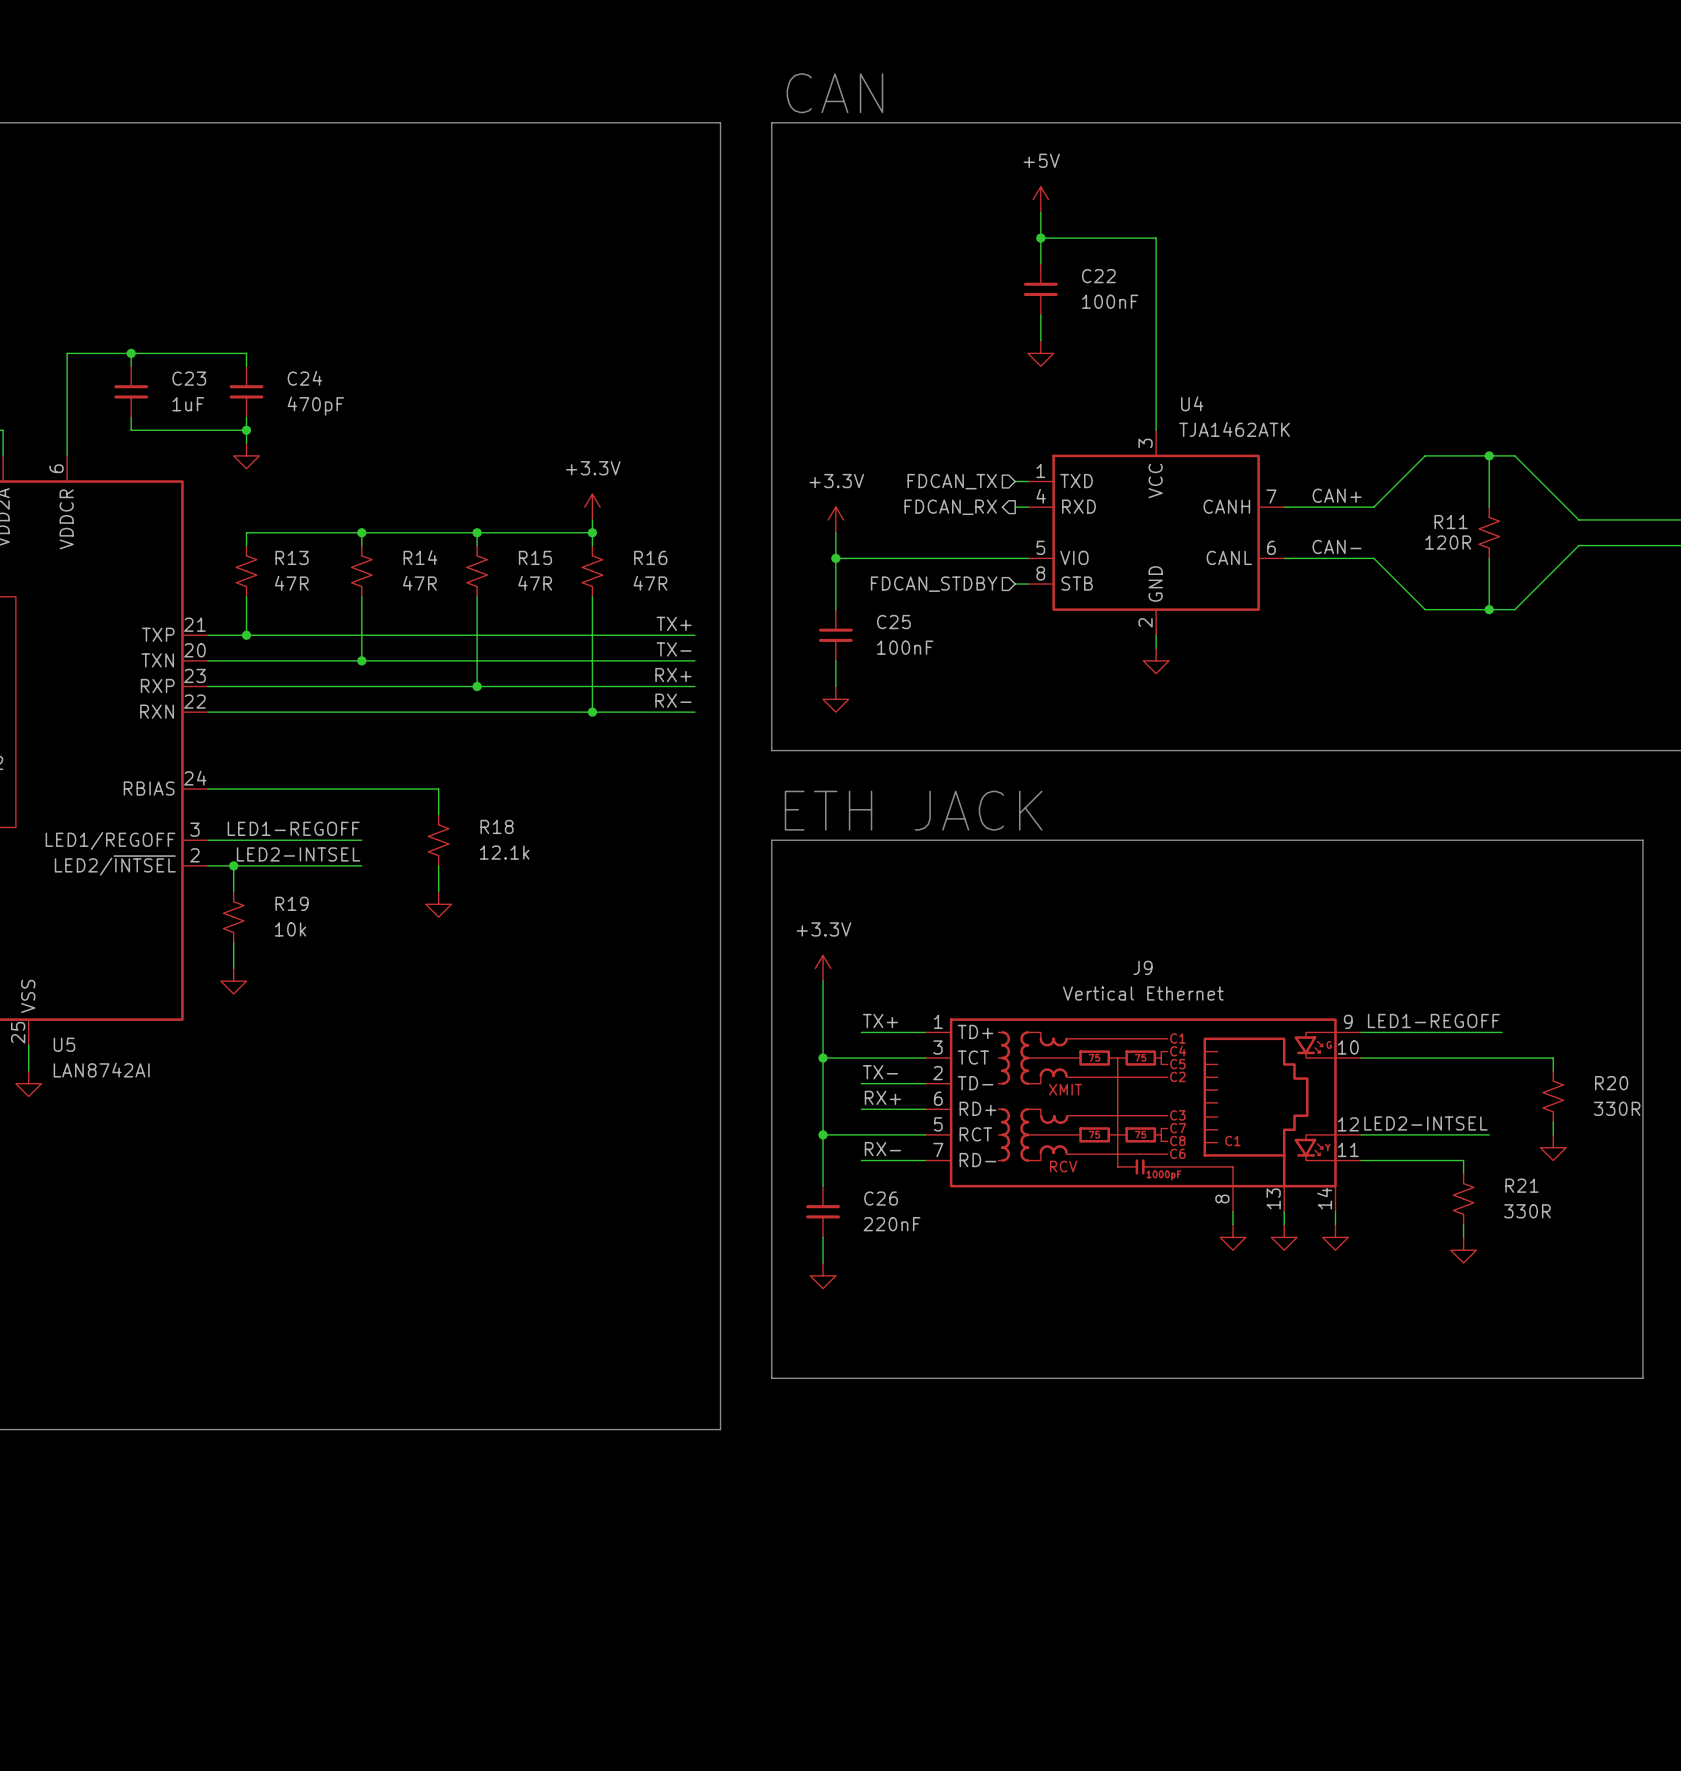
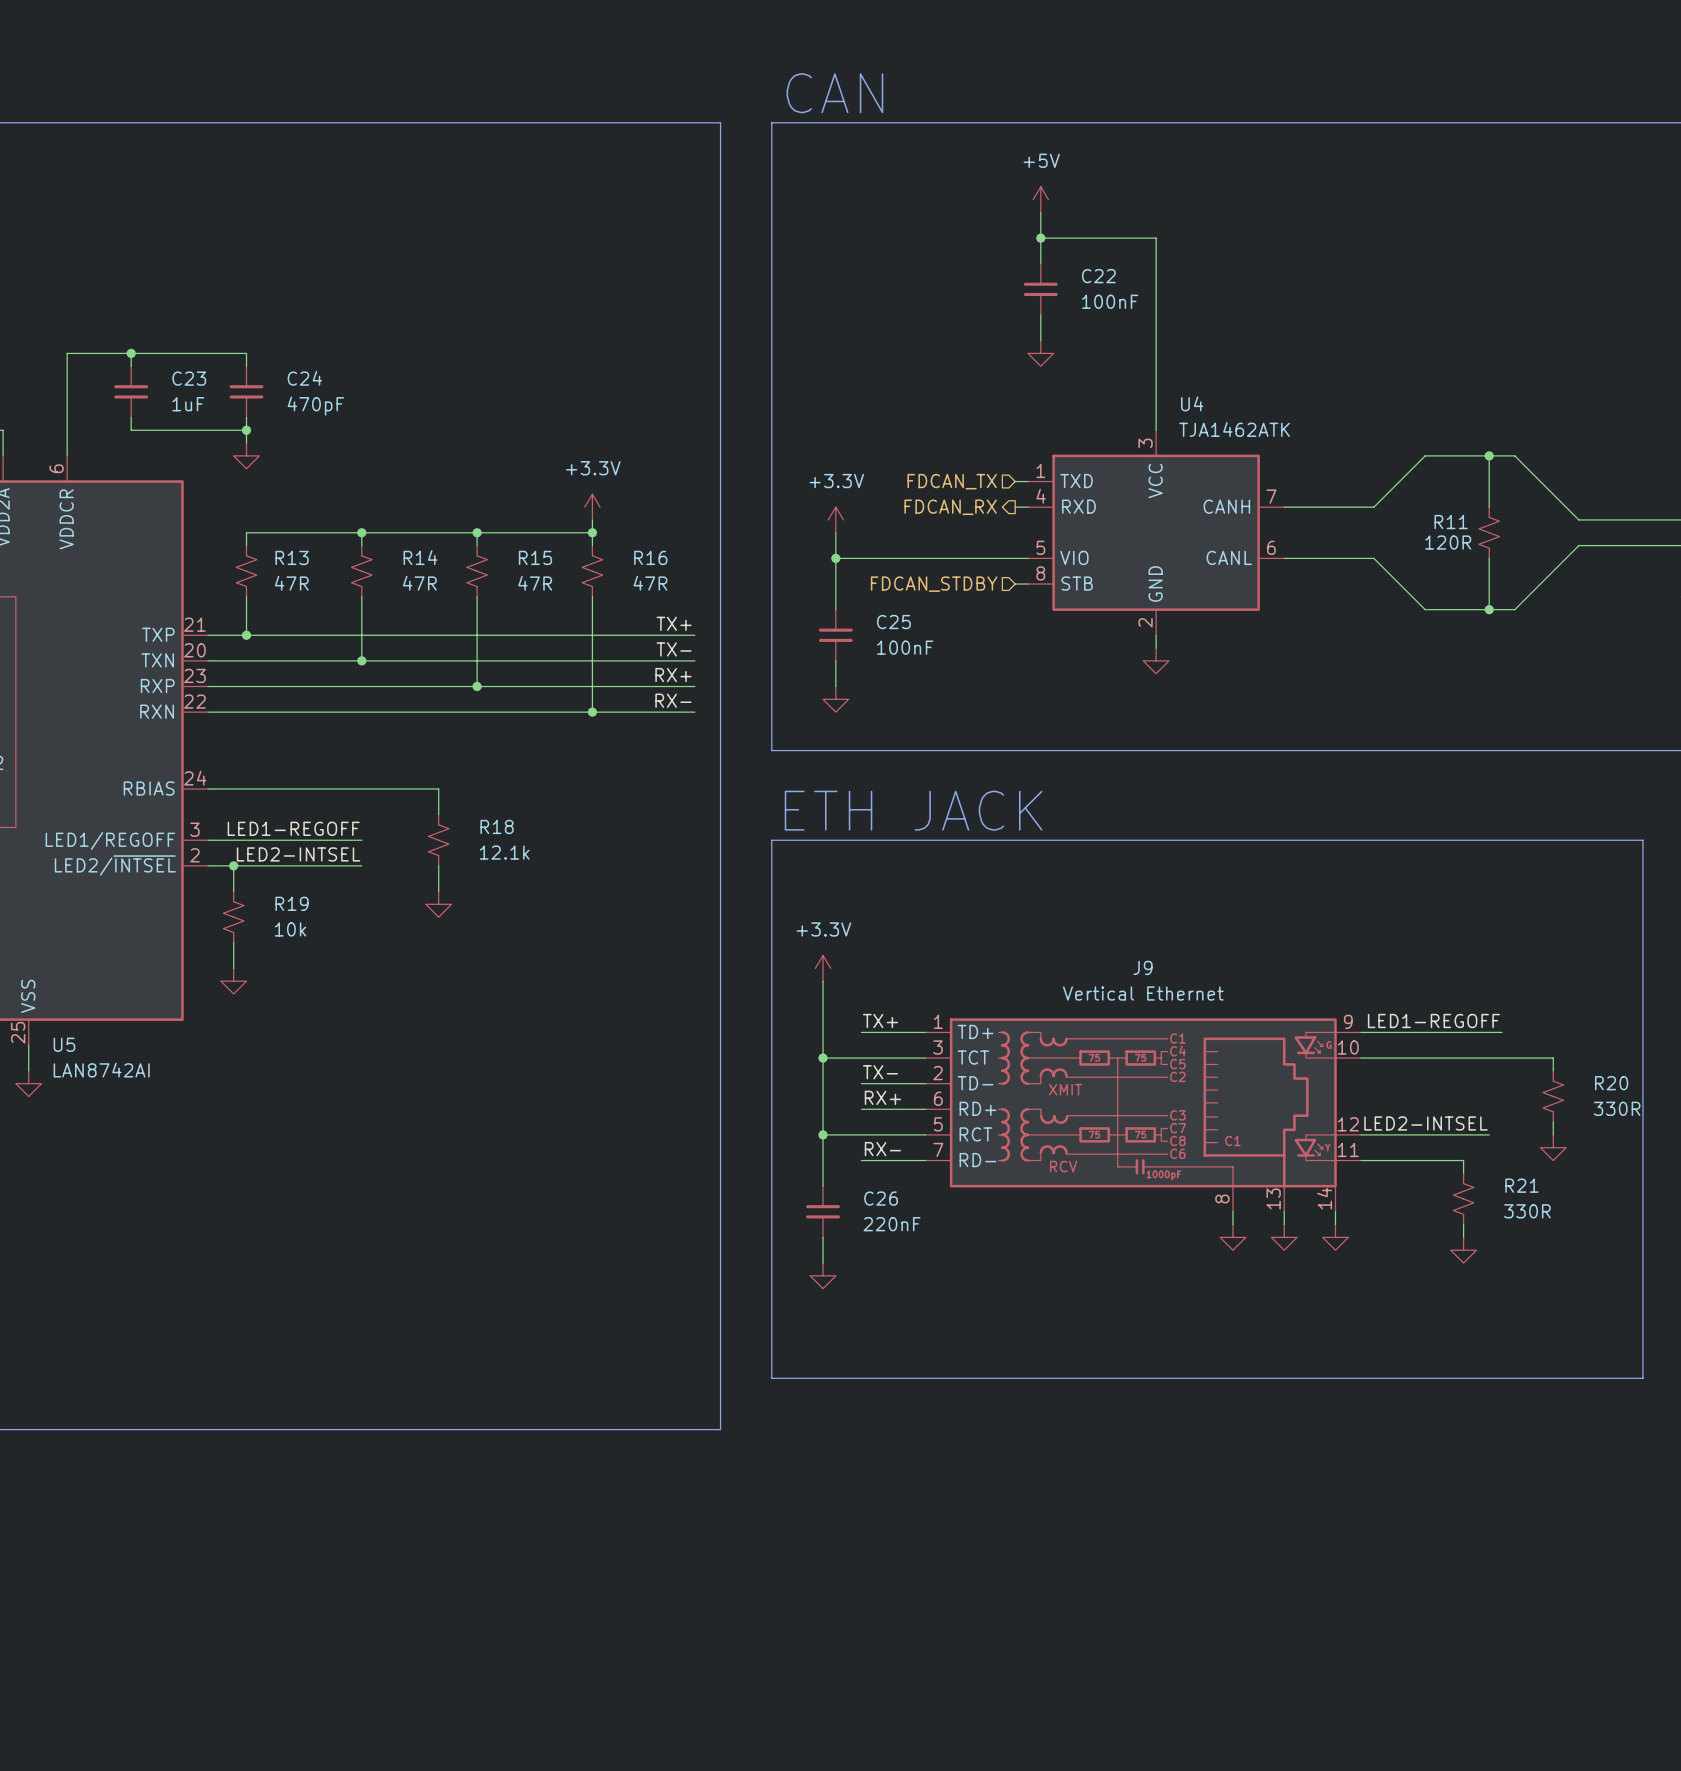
label: CAN+ (1337, 495) -> none
label: CAN- (1337, 546) -> none

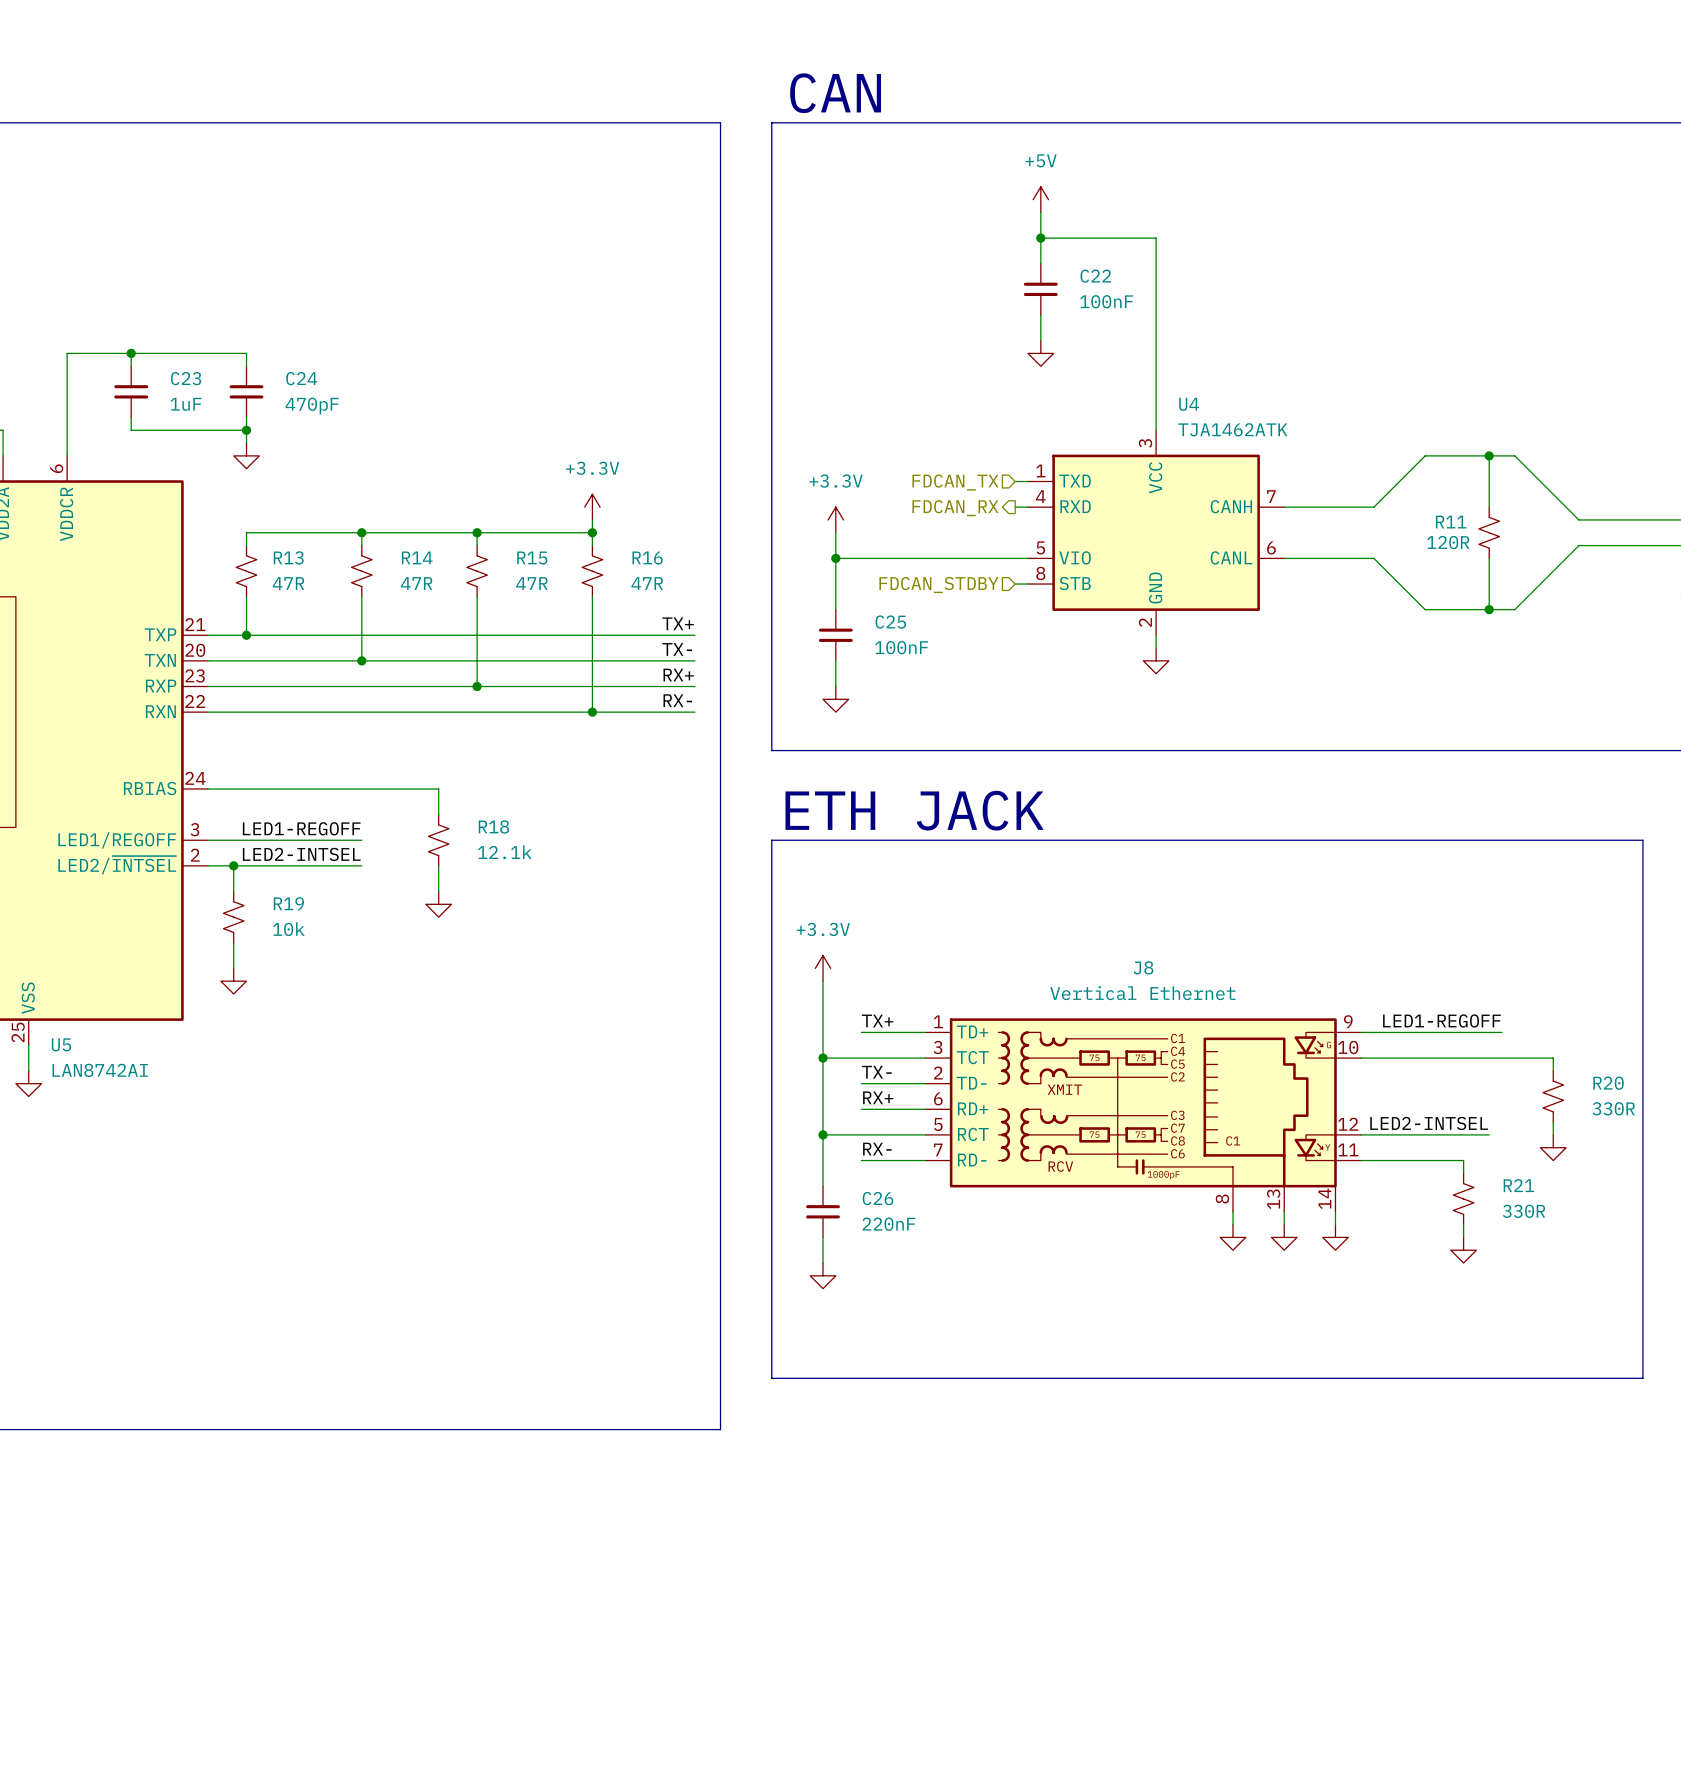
J9 name: J9 (1143, 967) -> J8 (1143, 967)

